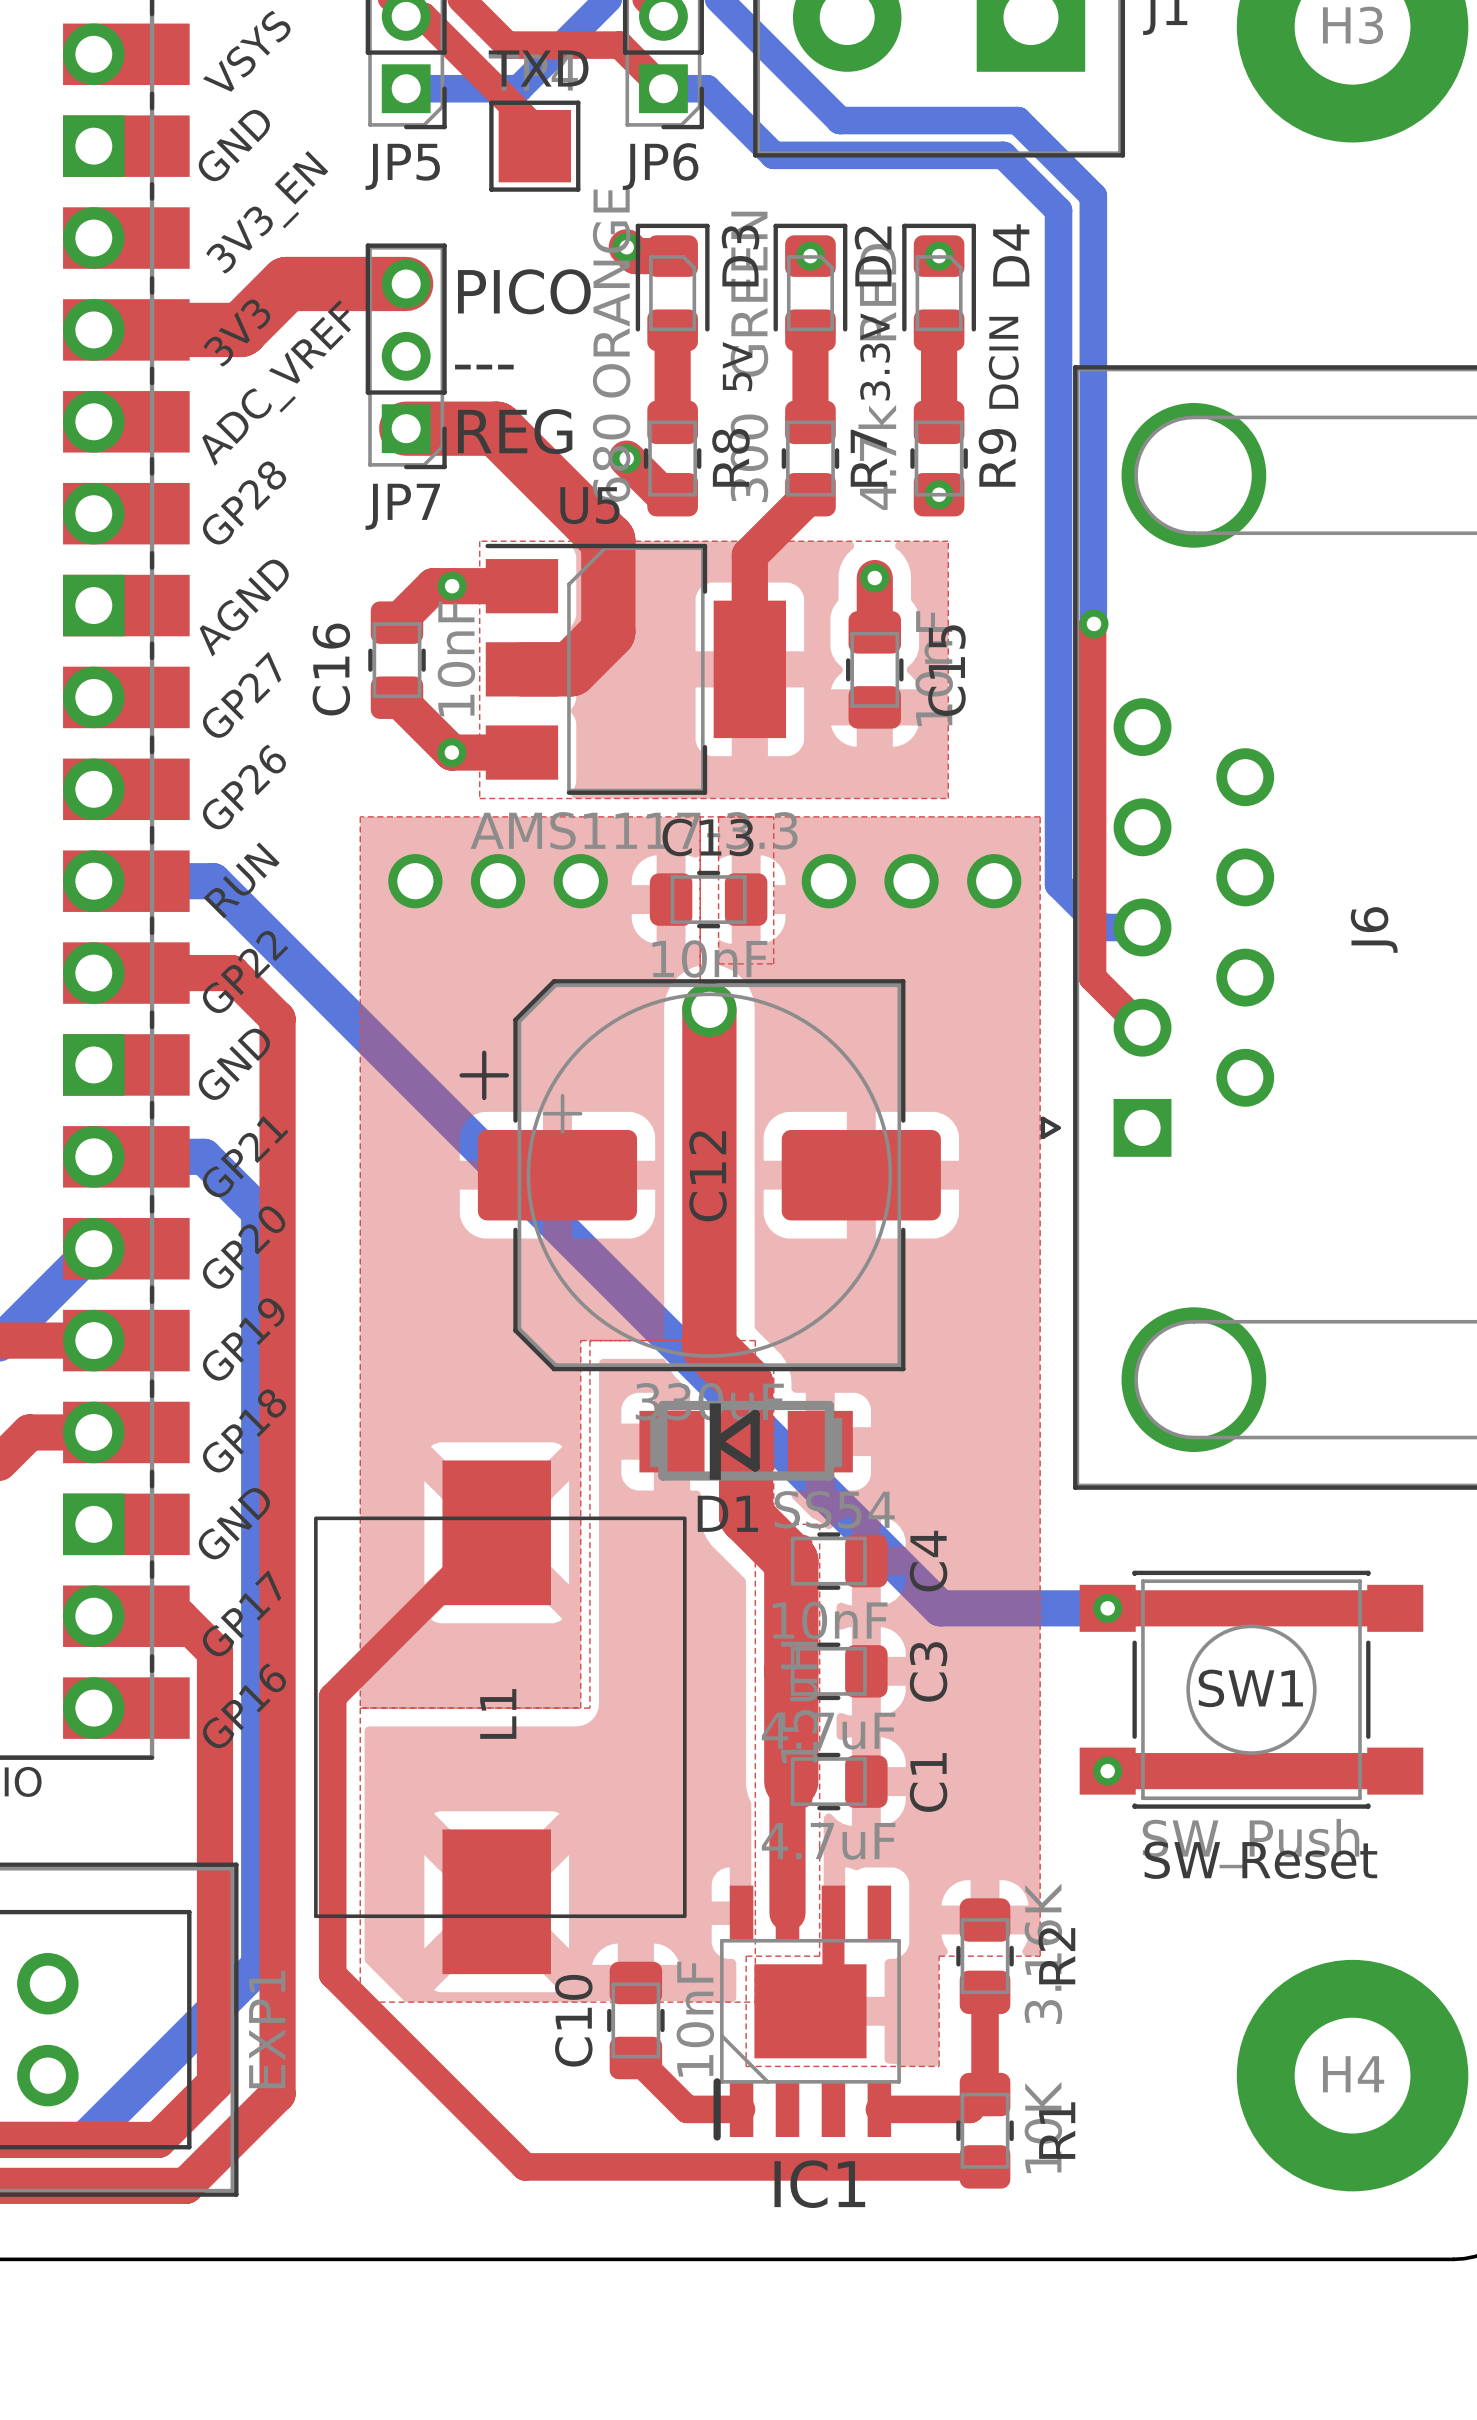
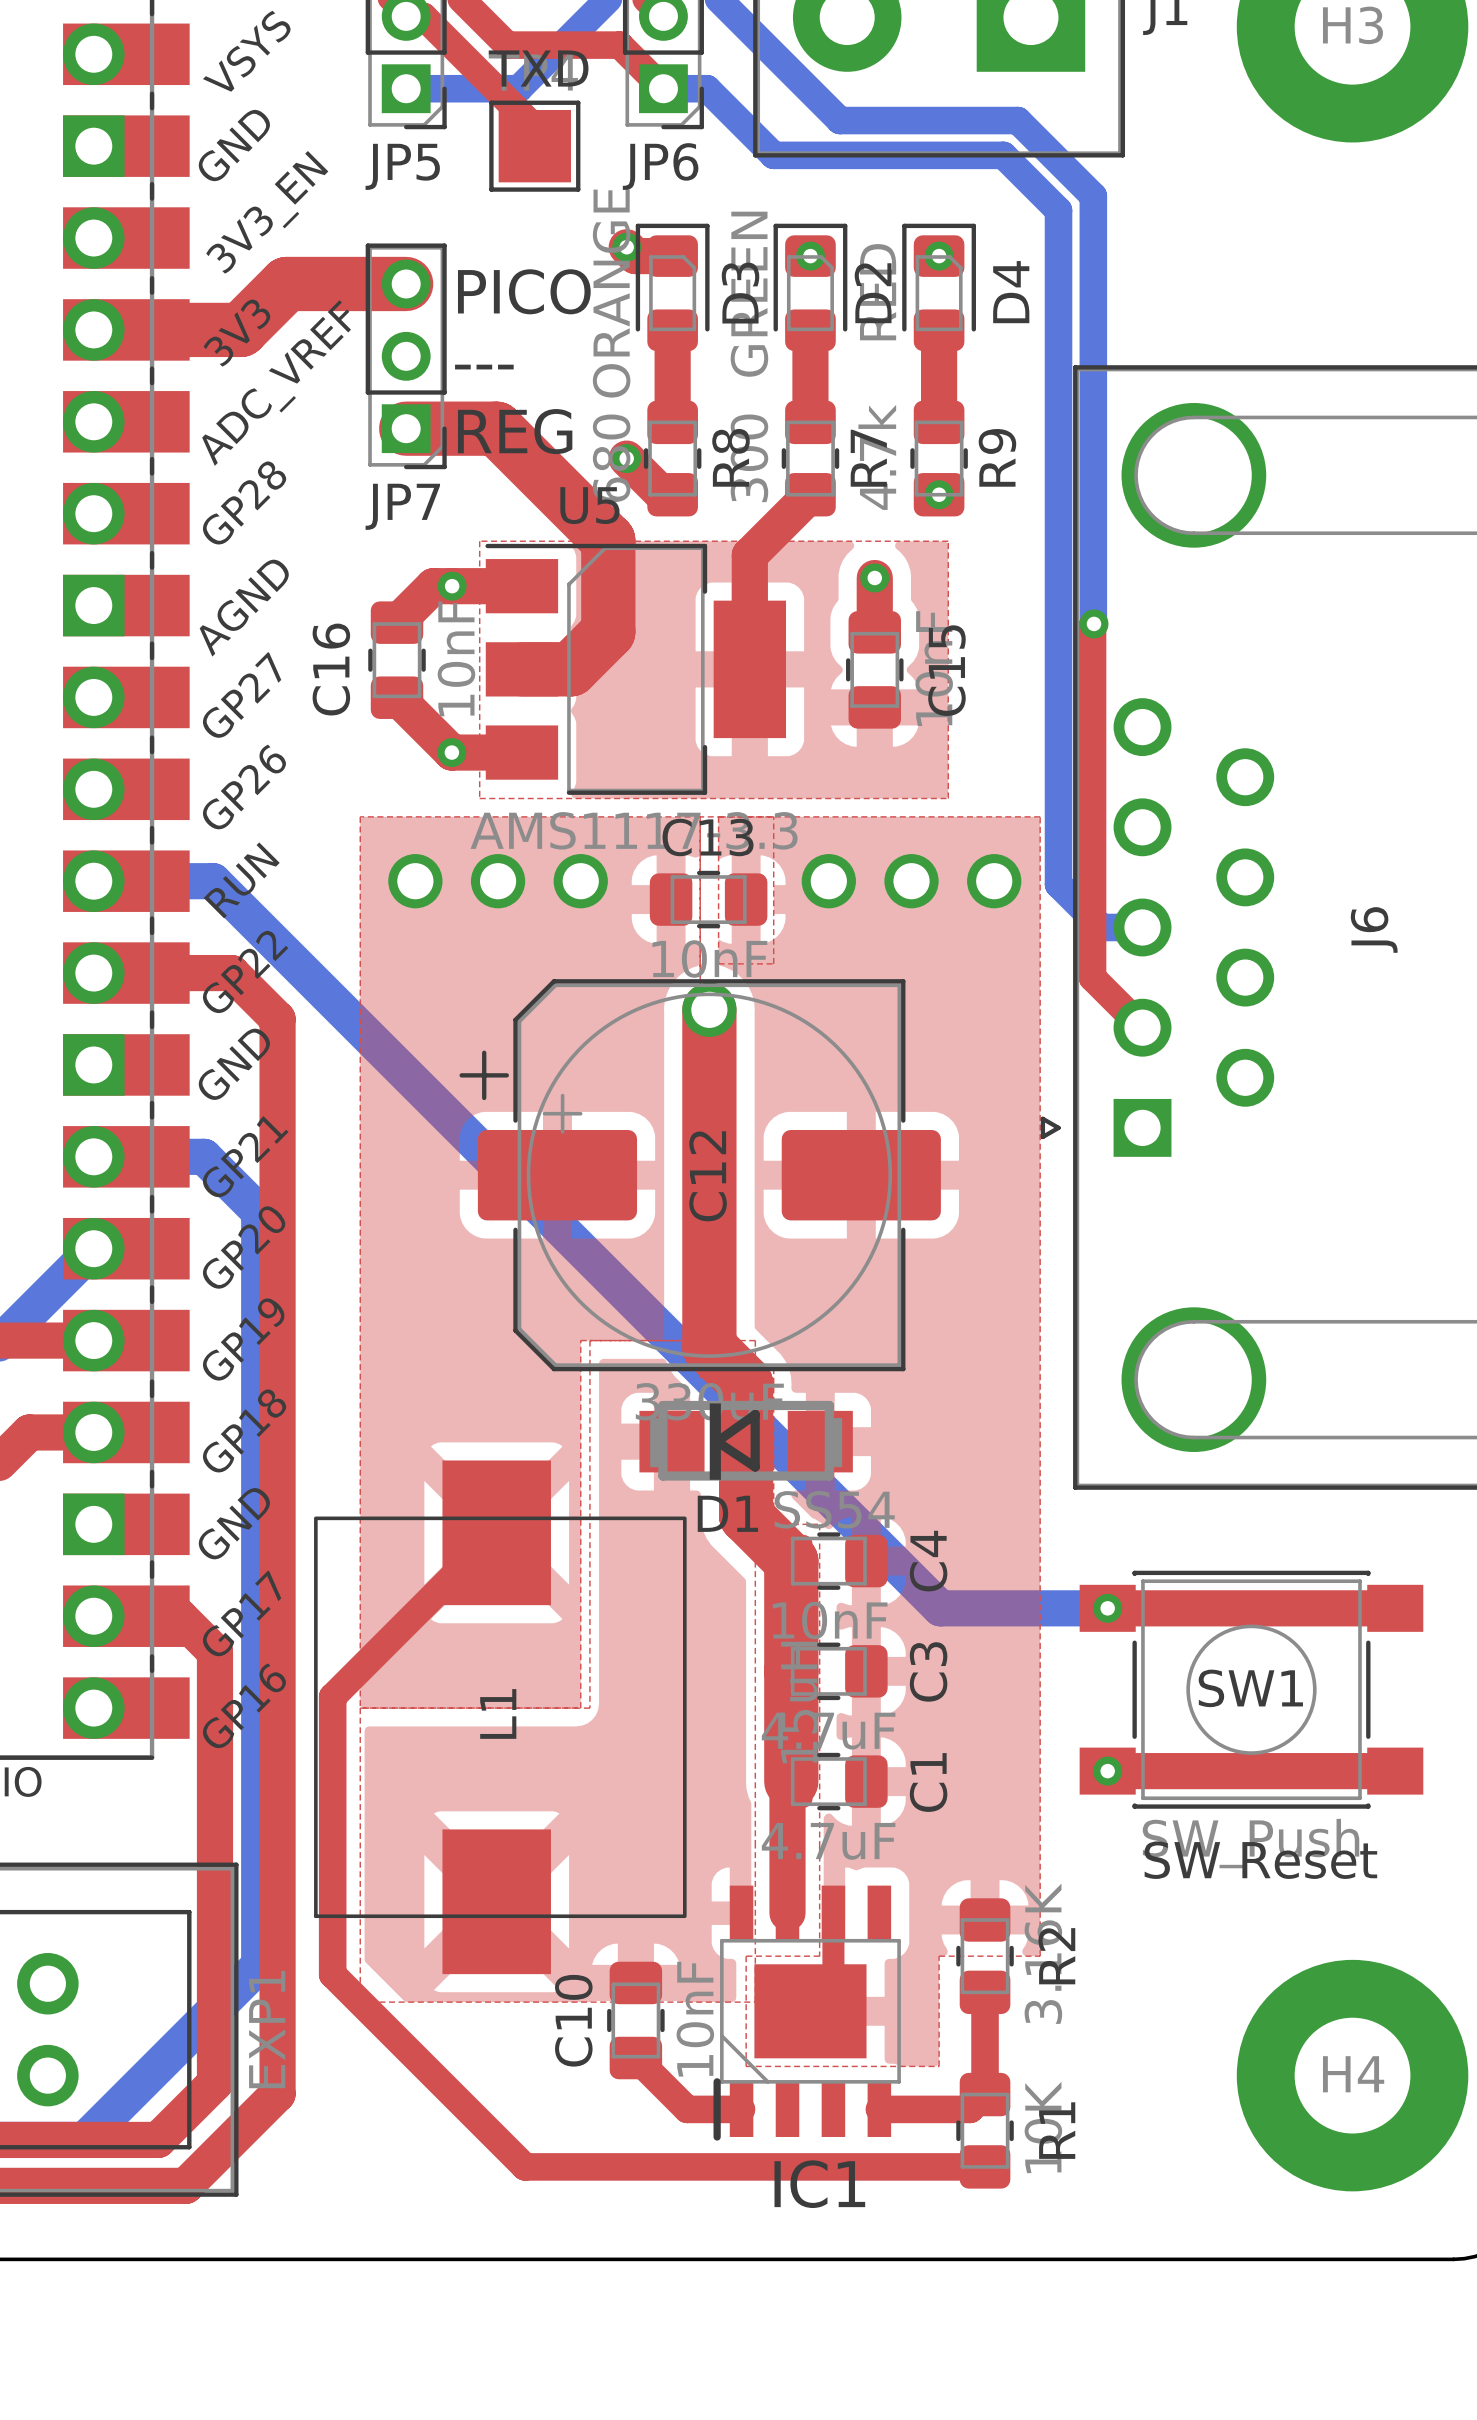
D3 name position: D3 (740, 255) -> D3 (740, 293)
D4 name position: D4 (1011, 255) -> D4 (1011, 292)
D2 name position: D2 (873, 256) -> D2 (873, 293)
text: 3.3V (875, 356) -> none
text: DCIN (1003, 362) -> none
text: 5V (737, 366) -> none

